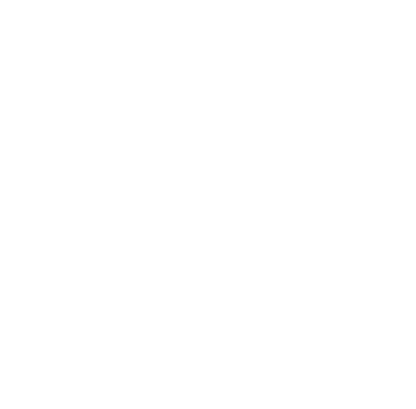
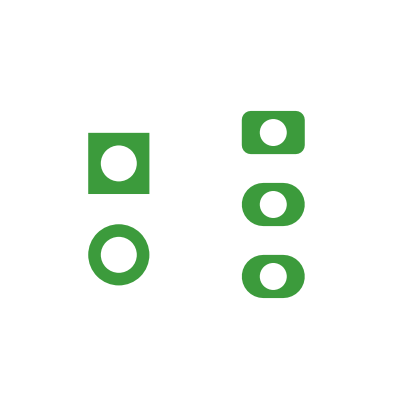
part: none -> (273, 204)
part: none -> (118, 209)

